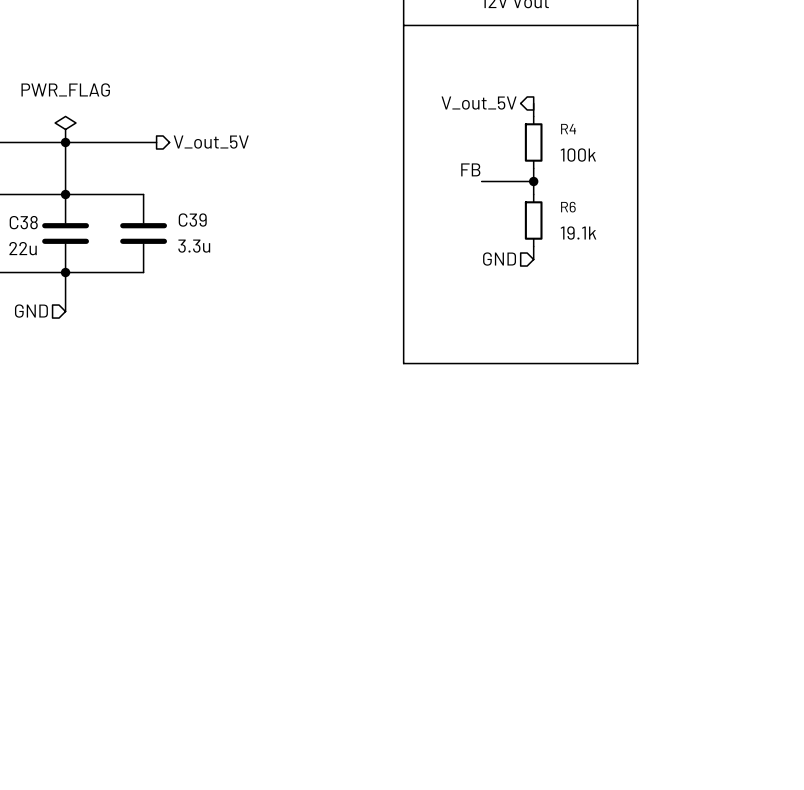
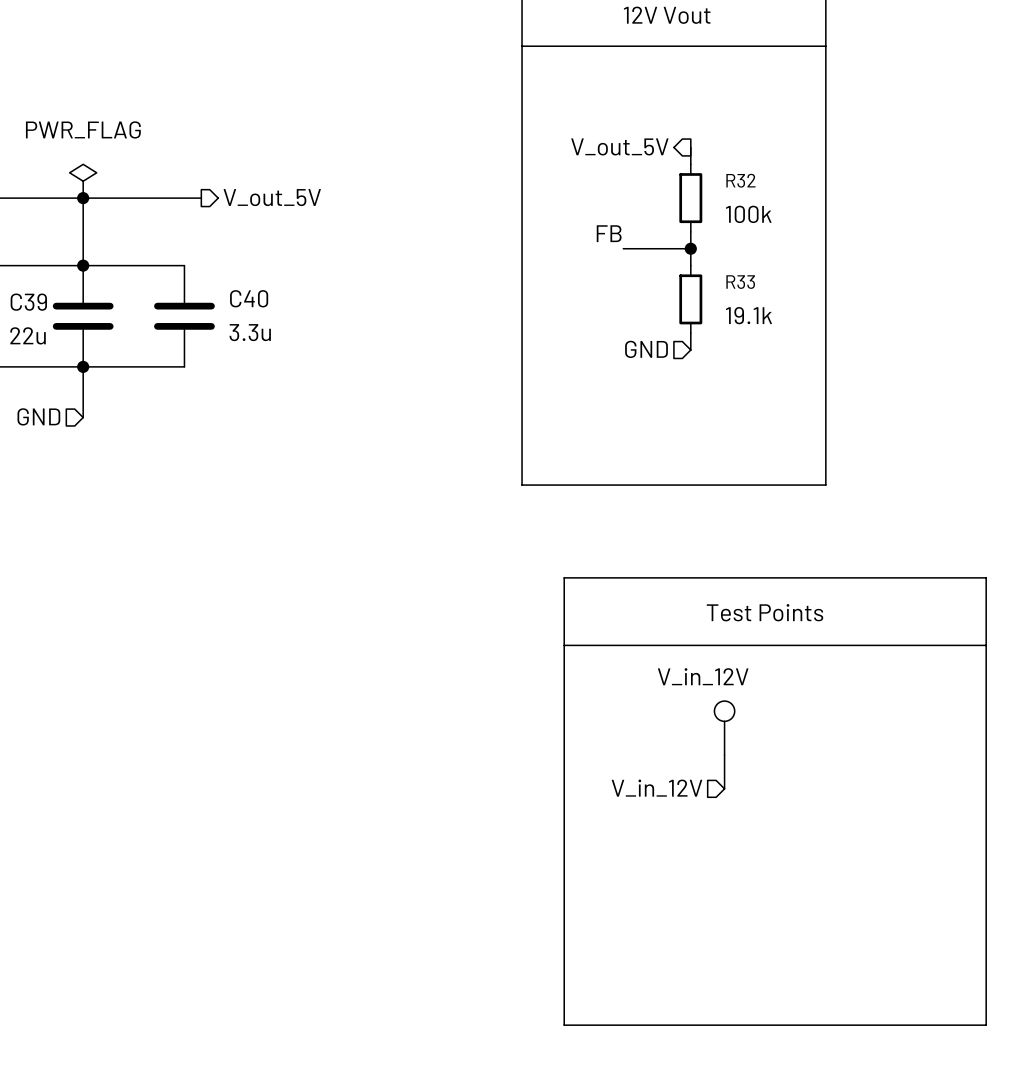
R4 name: R4 (568, 129) -> R32 (740, 180)
R6 name: R6 (568, 207) -> R33 (740, 282)
C39 name: C39 (192, 220) -> C40 (249, 298)
C38 name: C38 (23, 222) -> C39 (28, 302)
line: none -> (564, 577) (986, 577) (986, 1025) (564, 1025) (564, 577)
text: none -> Test Points (765, 612)
line: none -> (564, 645) (986, 645)
part: none -> V_in_12V (724, 728)
wire: none -> (724, 755) (724, 788)
hierarchical label: none -> V_in_12V (657, 788)

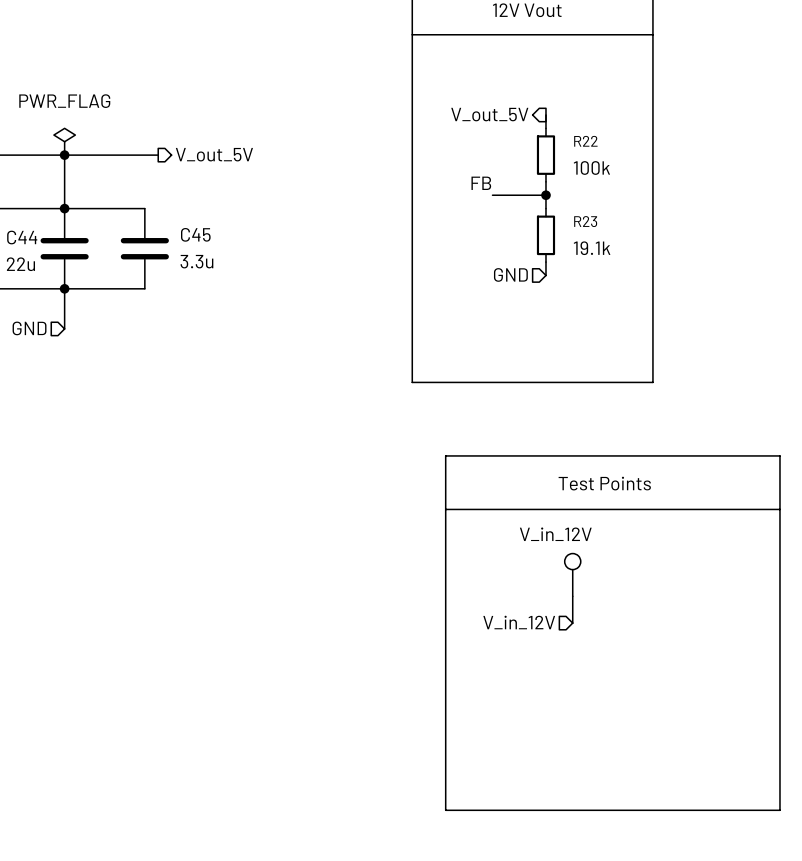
R32 name: R32 (740, 180) -> R22 (585, 141)
R33 name: R33 (740, 282) -> R23 (585, 221)
C40 name: C40 (249, 298) -> C45 (195, 234)
C39 name: C39 (28, 302) -> C44 (22, 237)

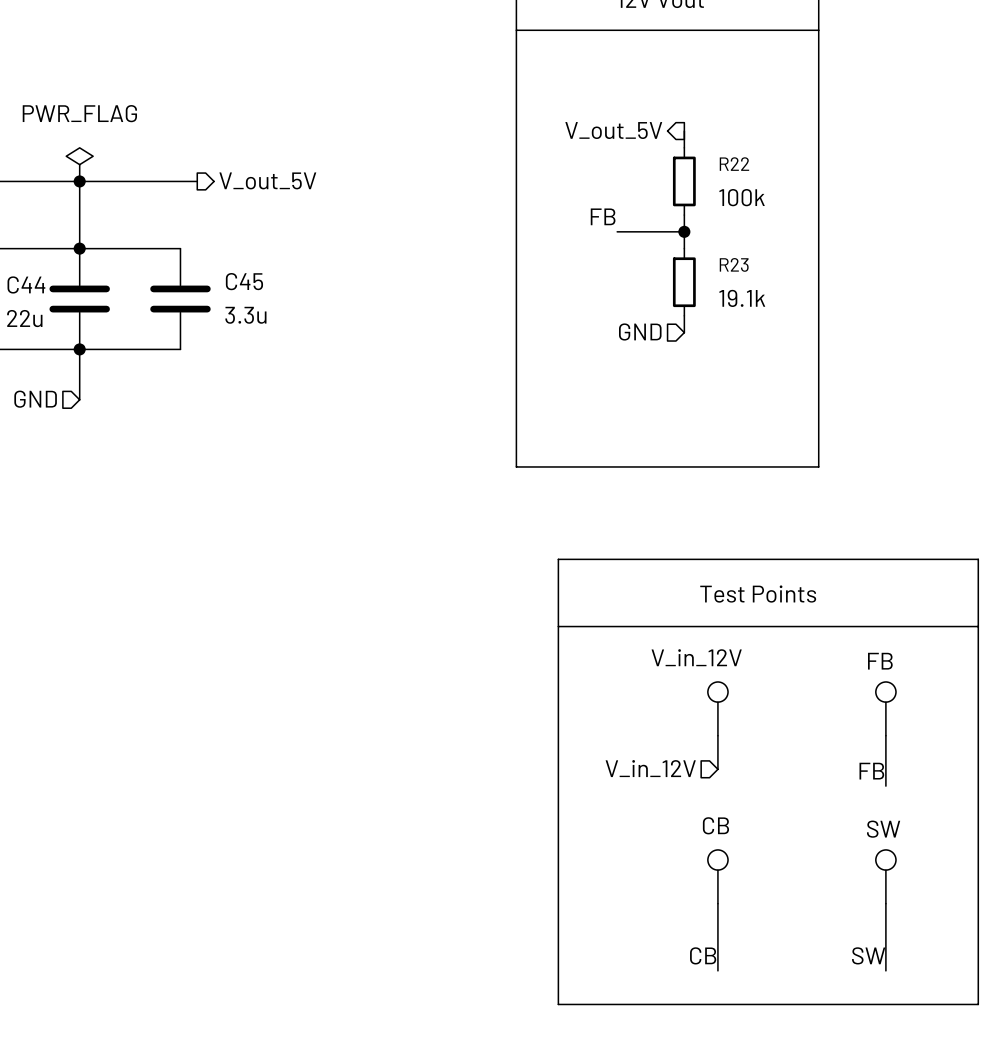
part: none -> FB (885, 708)
wire: none -> (885, 735) (885, 786)
label: none -> FB (871, 771)
part: none -> CB (717, 876)
part: none -> SW (885, 876)
wire: none -> (717, 903) (717, 970)
wire: none -> (885, 903) (885, 970)
label: none -> CB (703, 955)
label: none -> SW (868, 955)

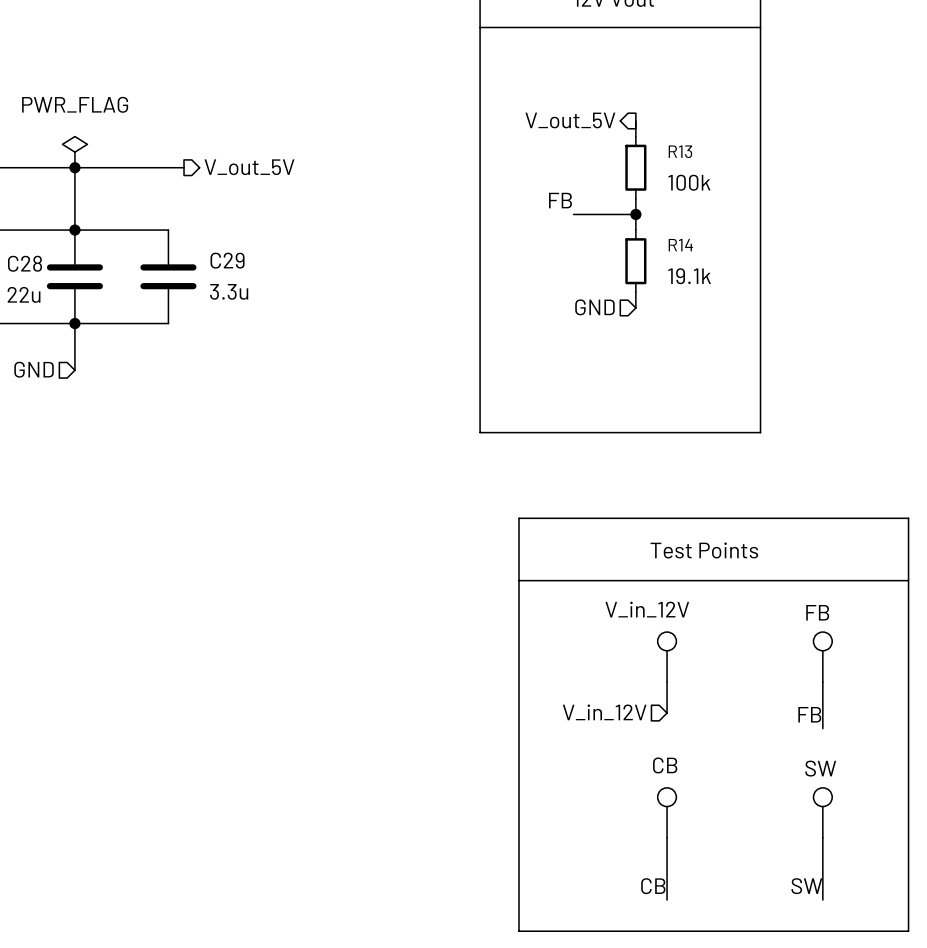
R22 name: R22 (734, 164) -> R13 (680, 151)
R23 name: R23 (734, 264) -> R14 (680, 245)
C45 name: C45 (244, 281) -> C29 (227, 260)
C44 name: C44 (26, 284) -> C28 (25, 263)

